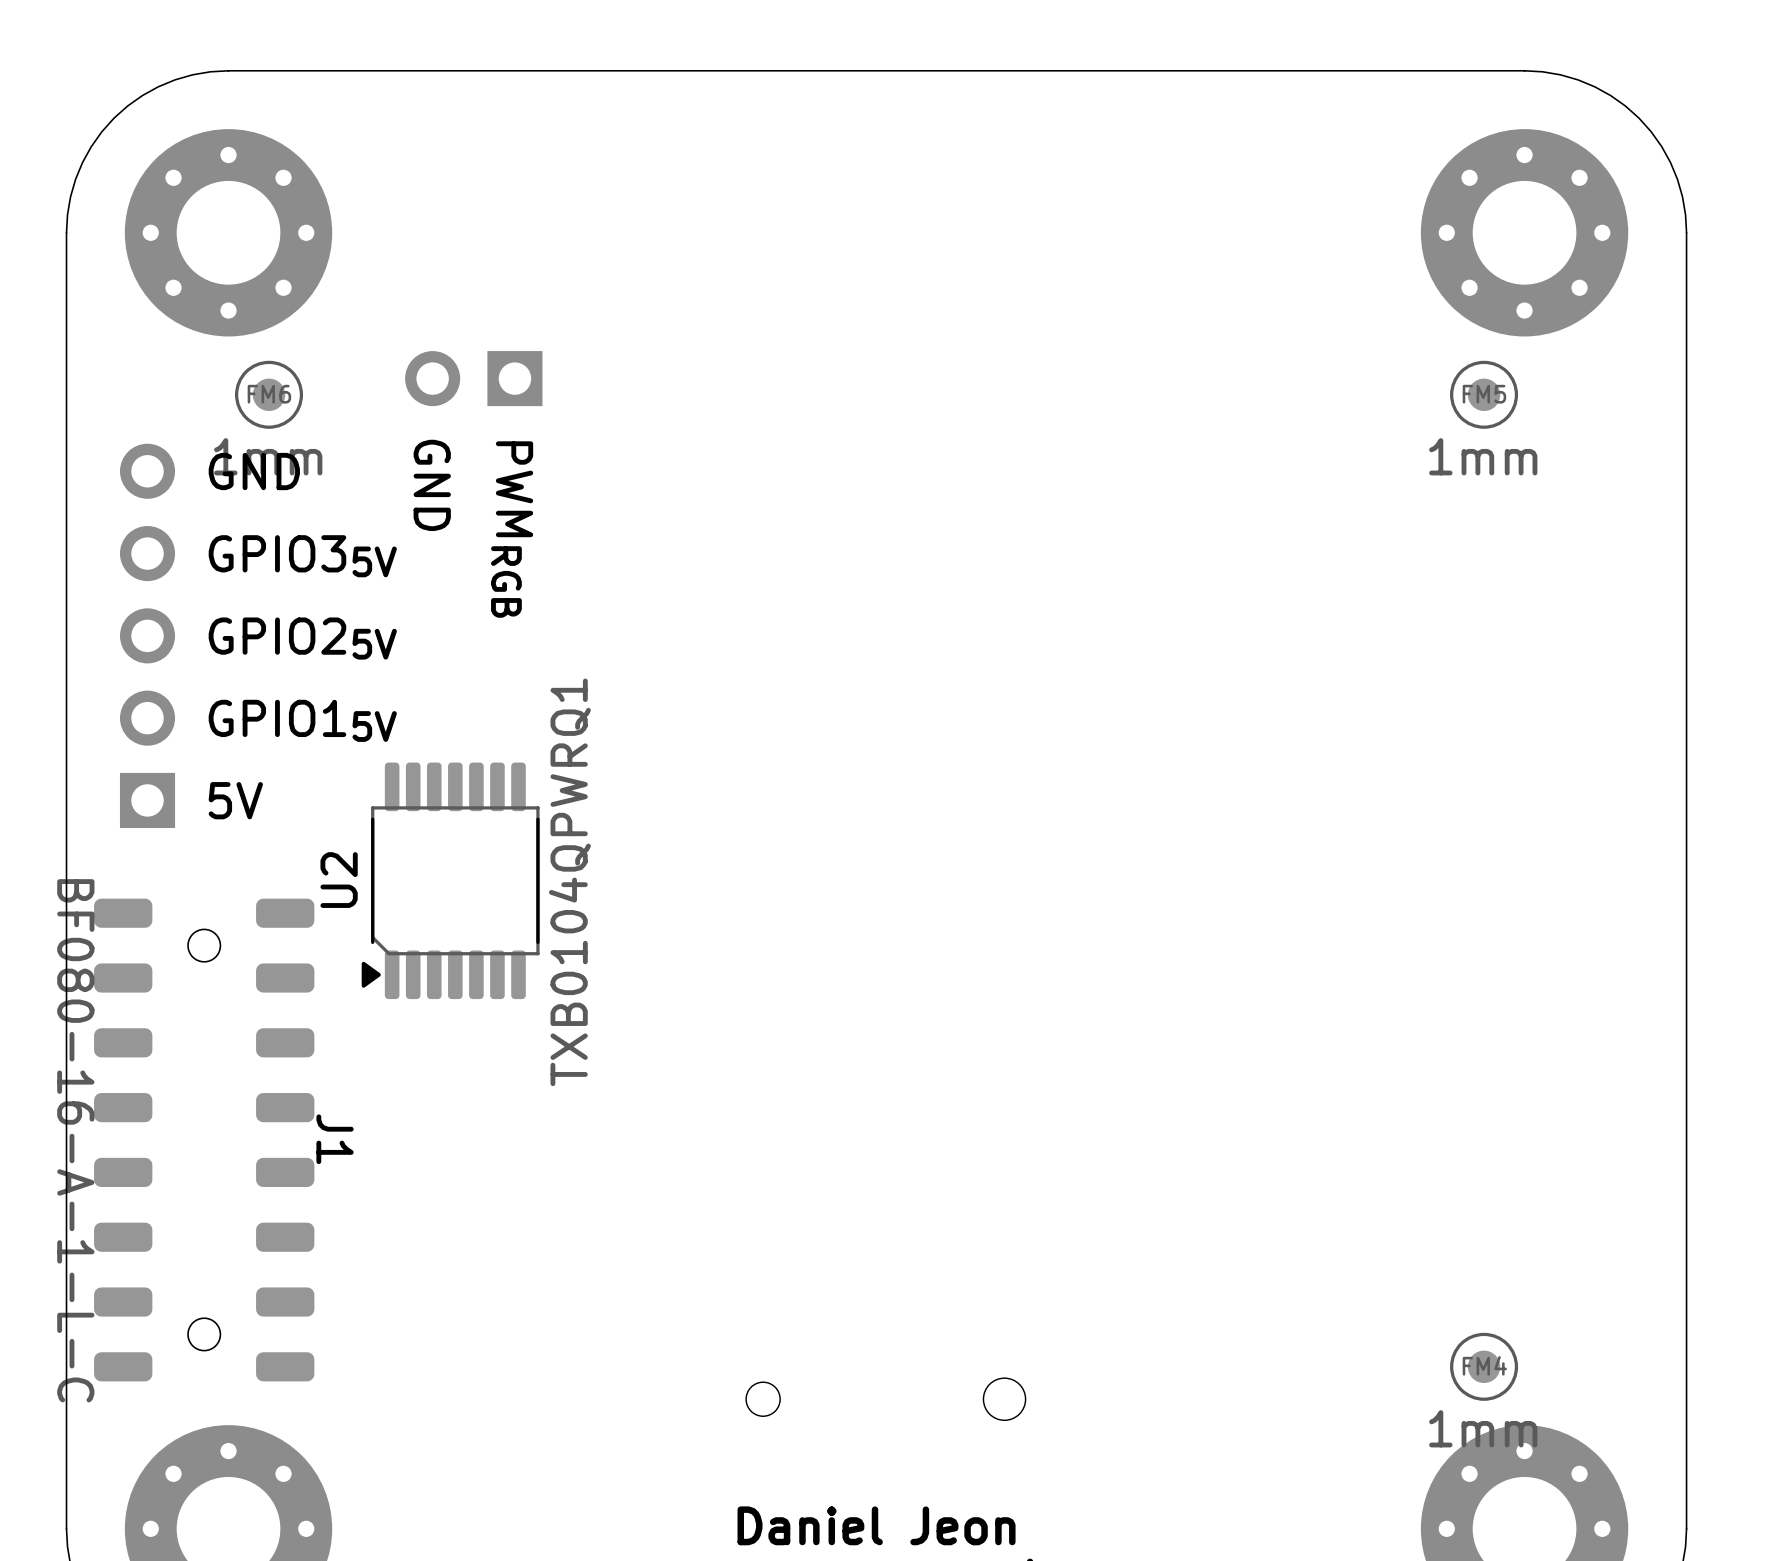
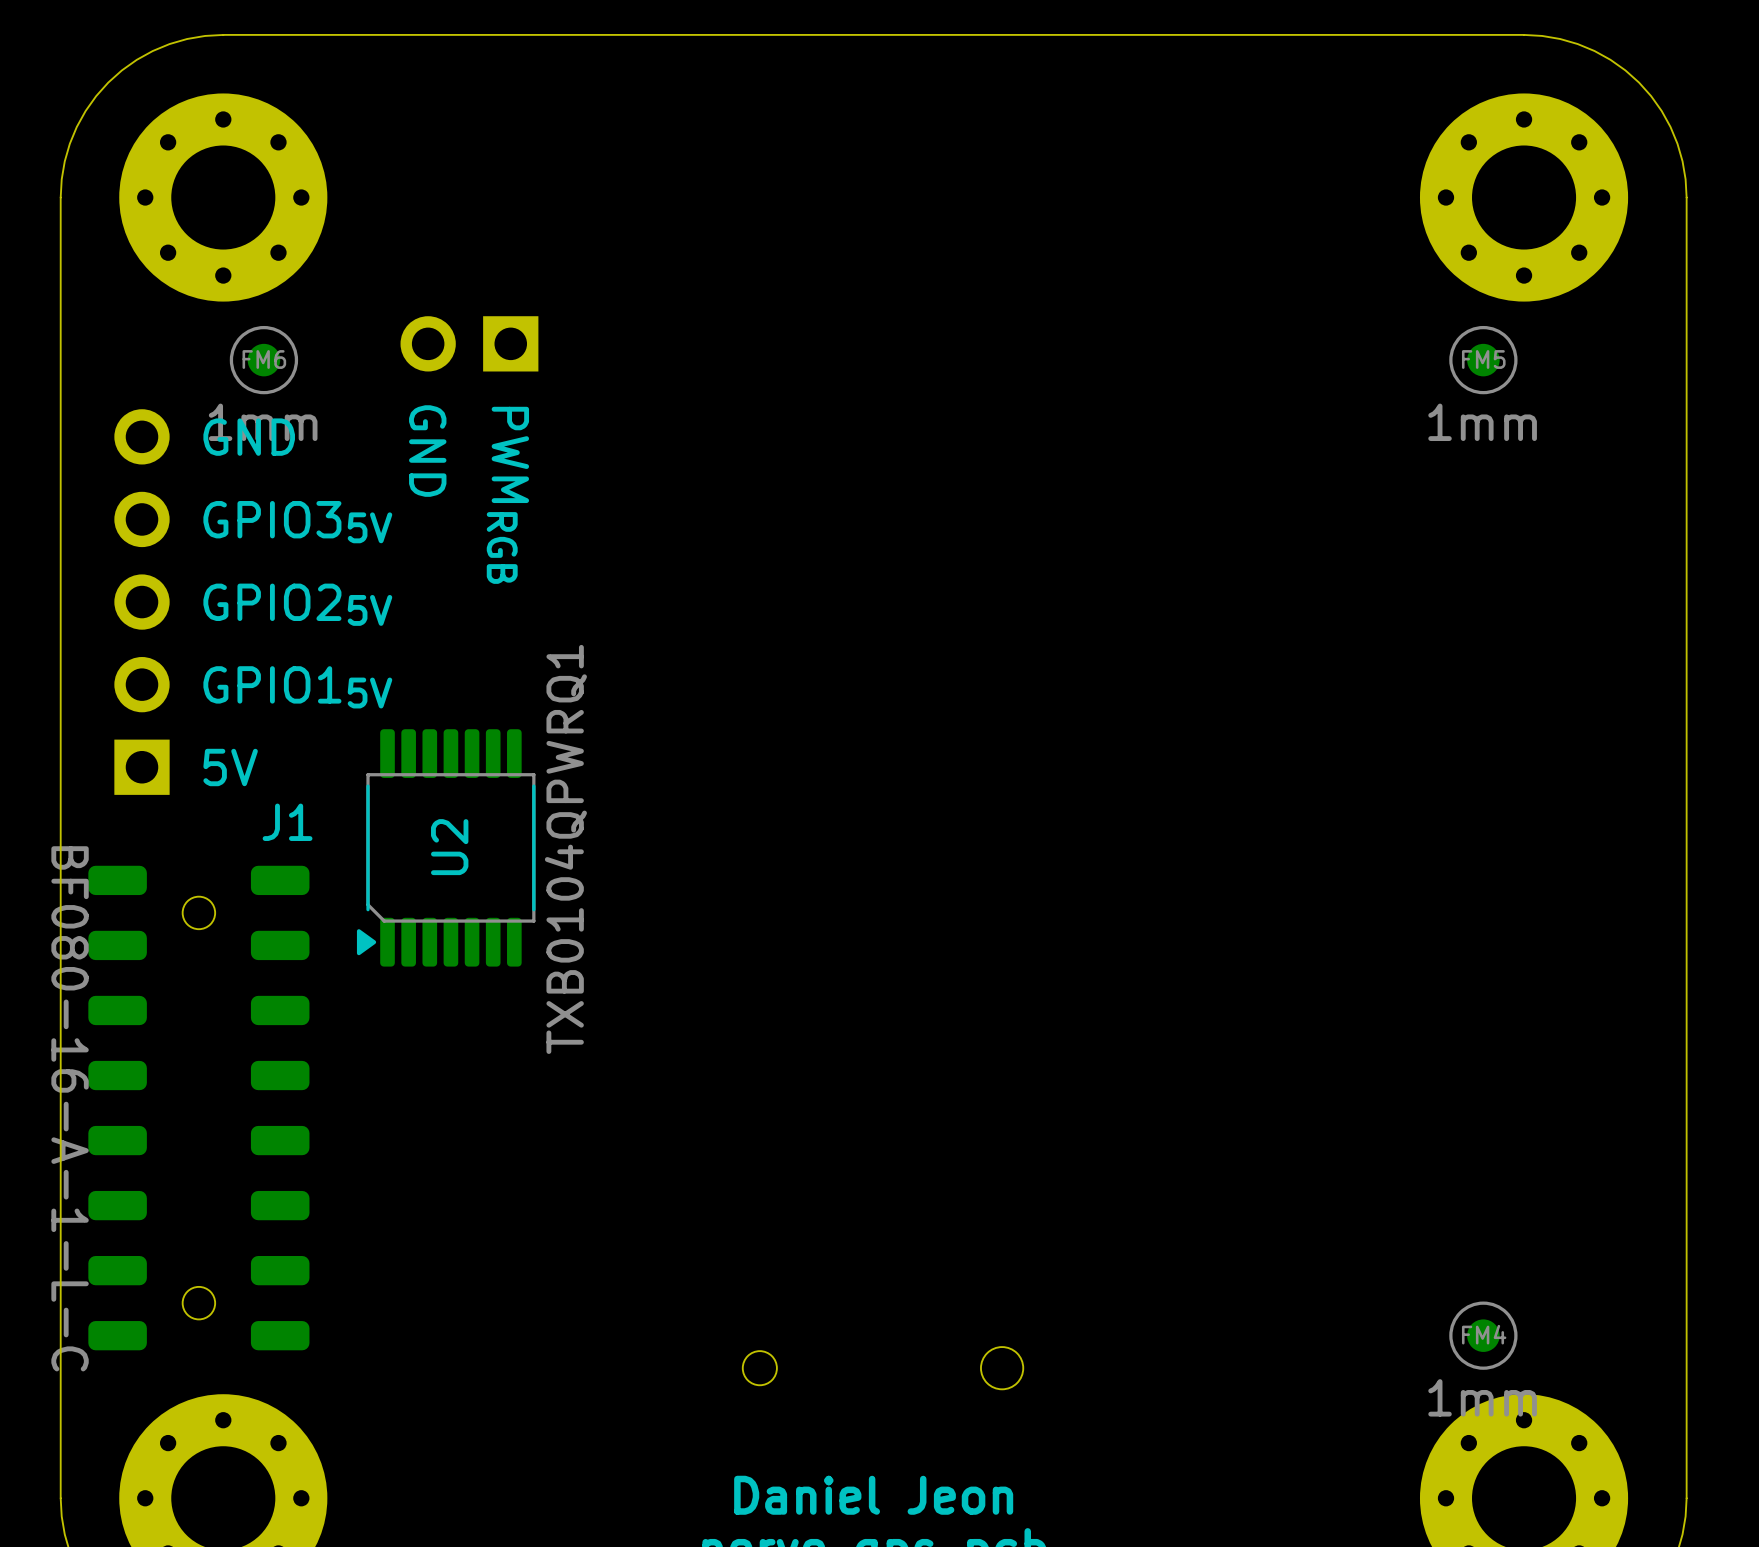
U2 name position: U2 (339, 880) -> U2 (449, 847)
J1 name rotation: 0° (335, 1139) -> 90° counterclockwise (287, 822)
J1 name position: J1 (335, 1139) -> J1 (287, 822)

